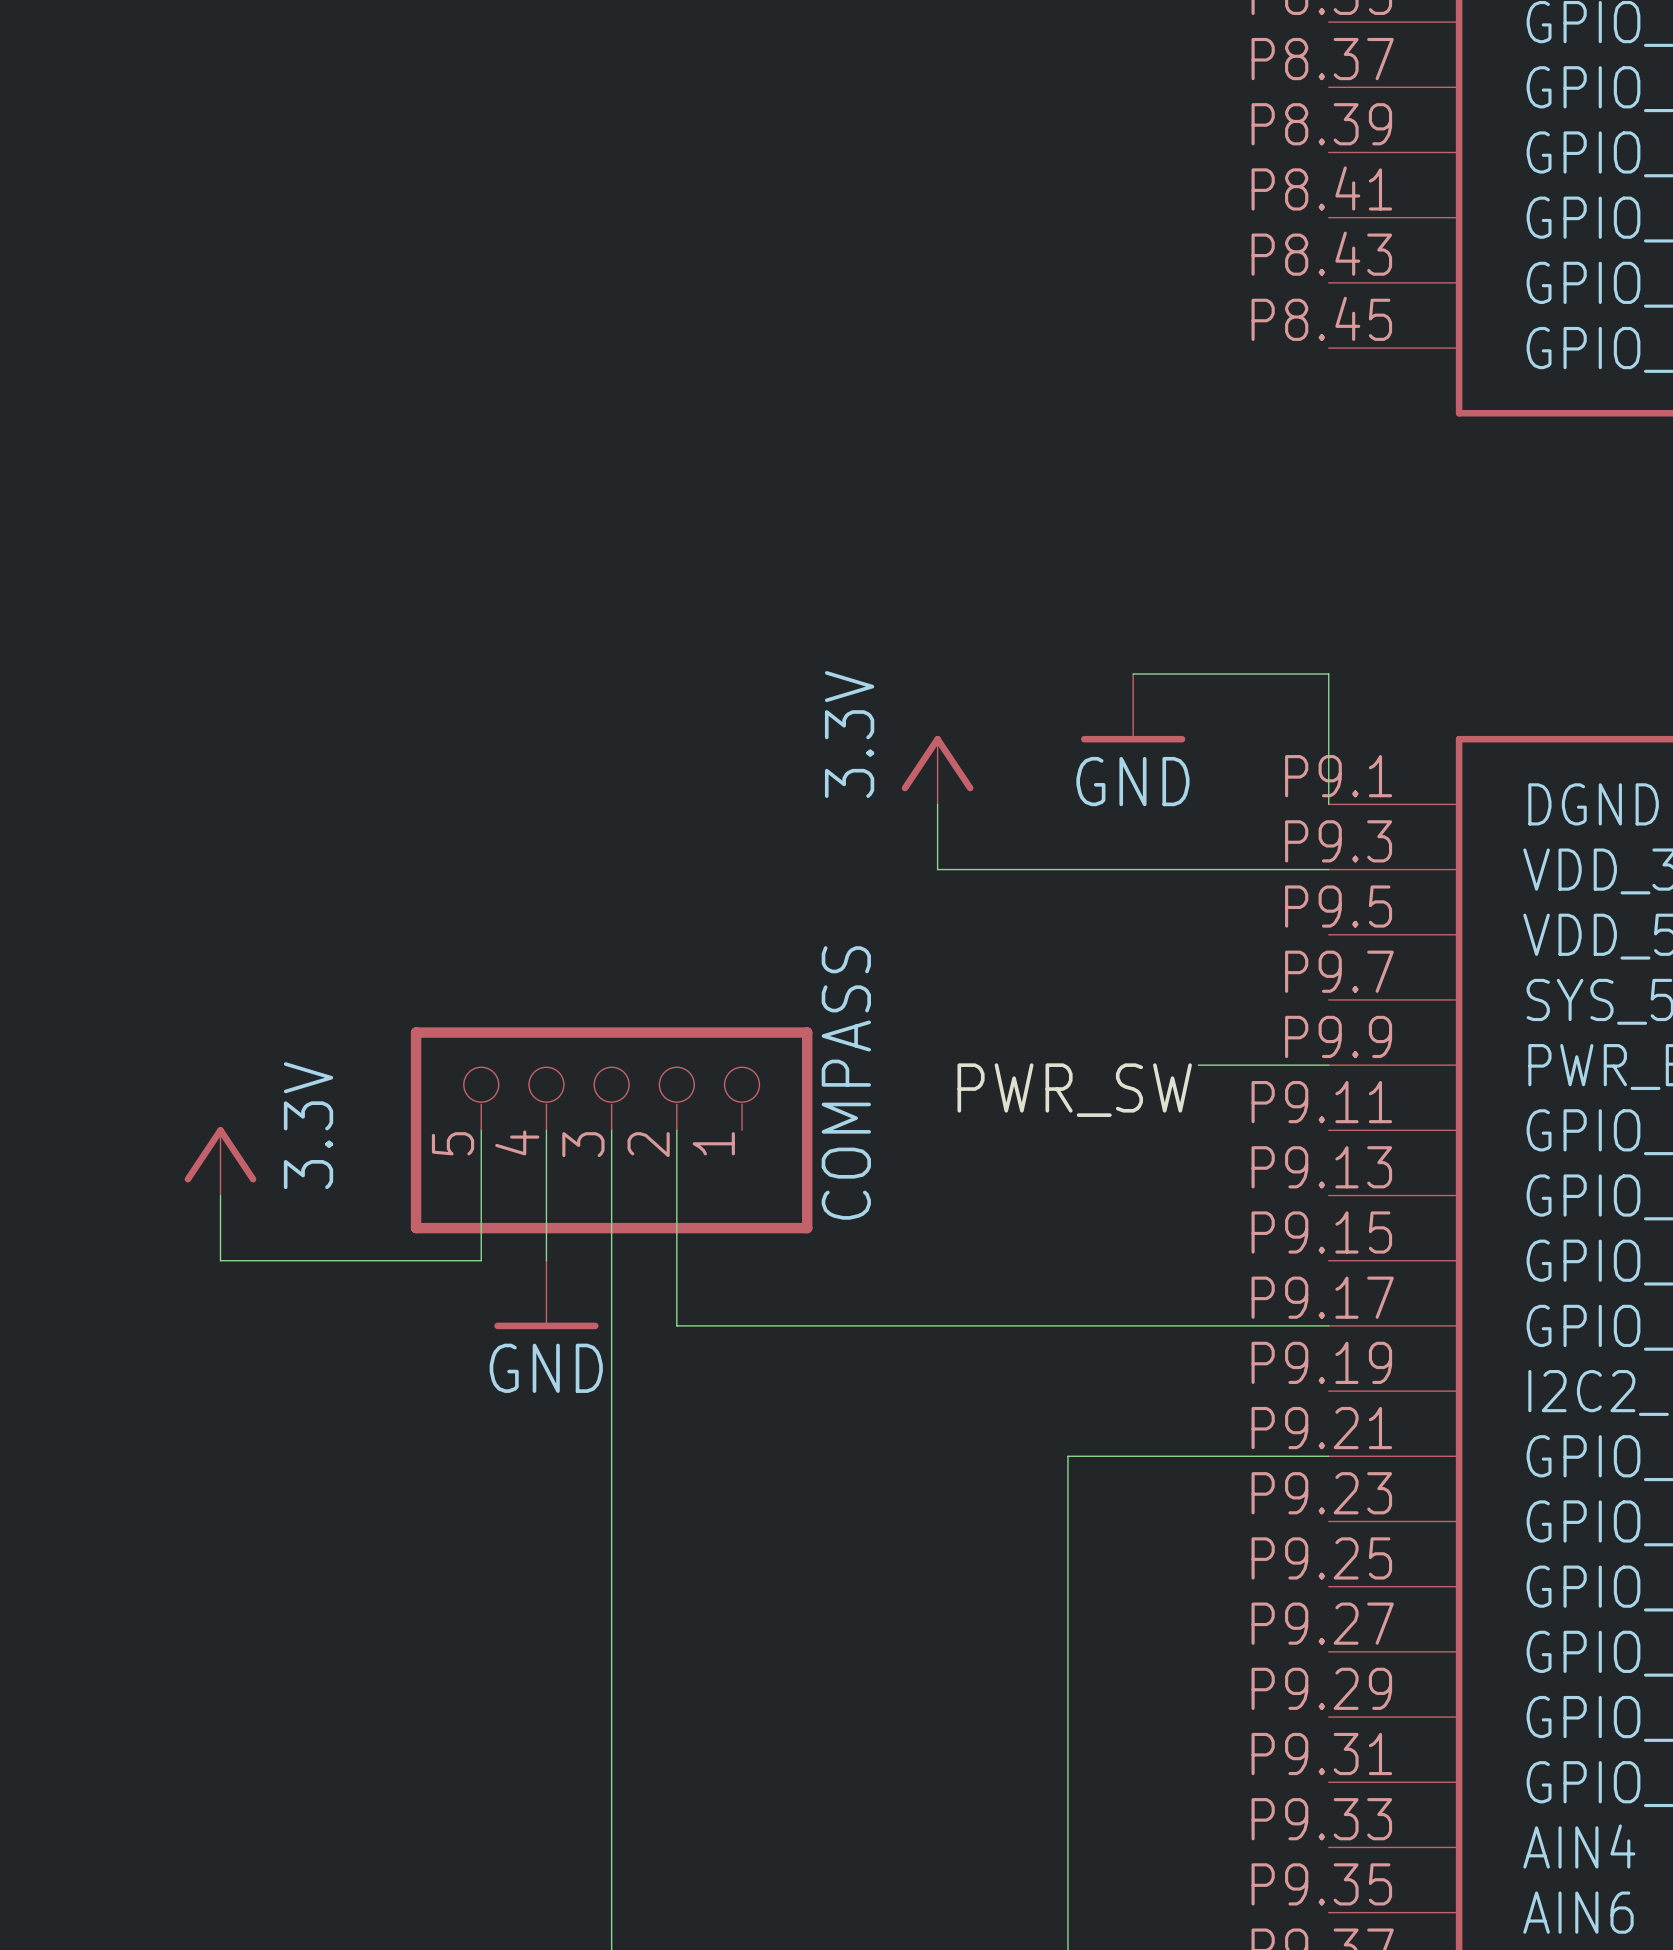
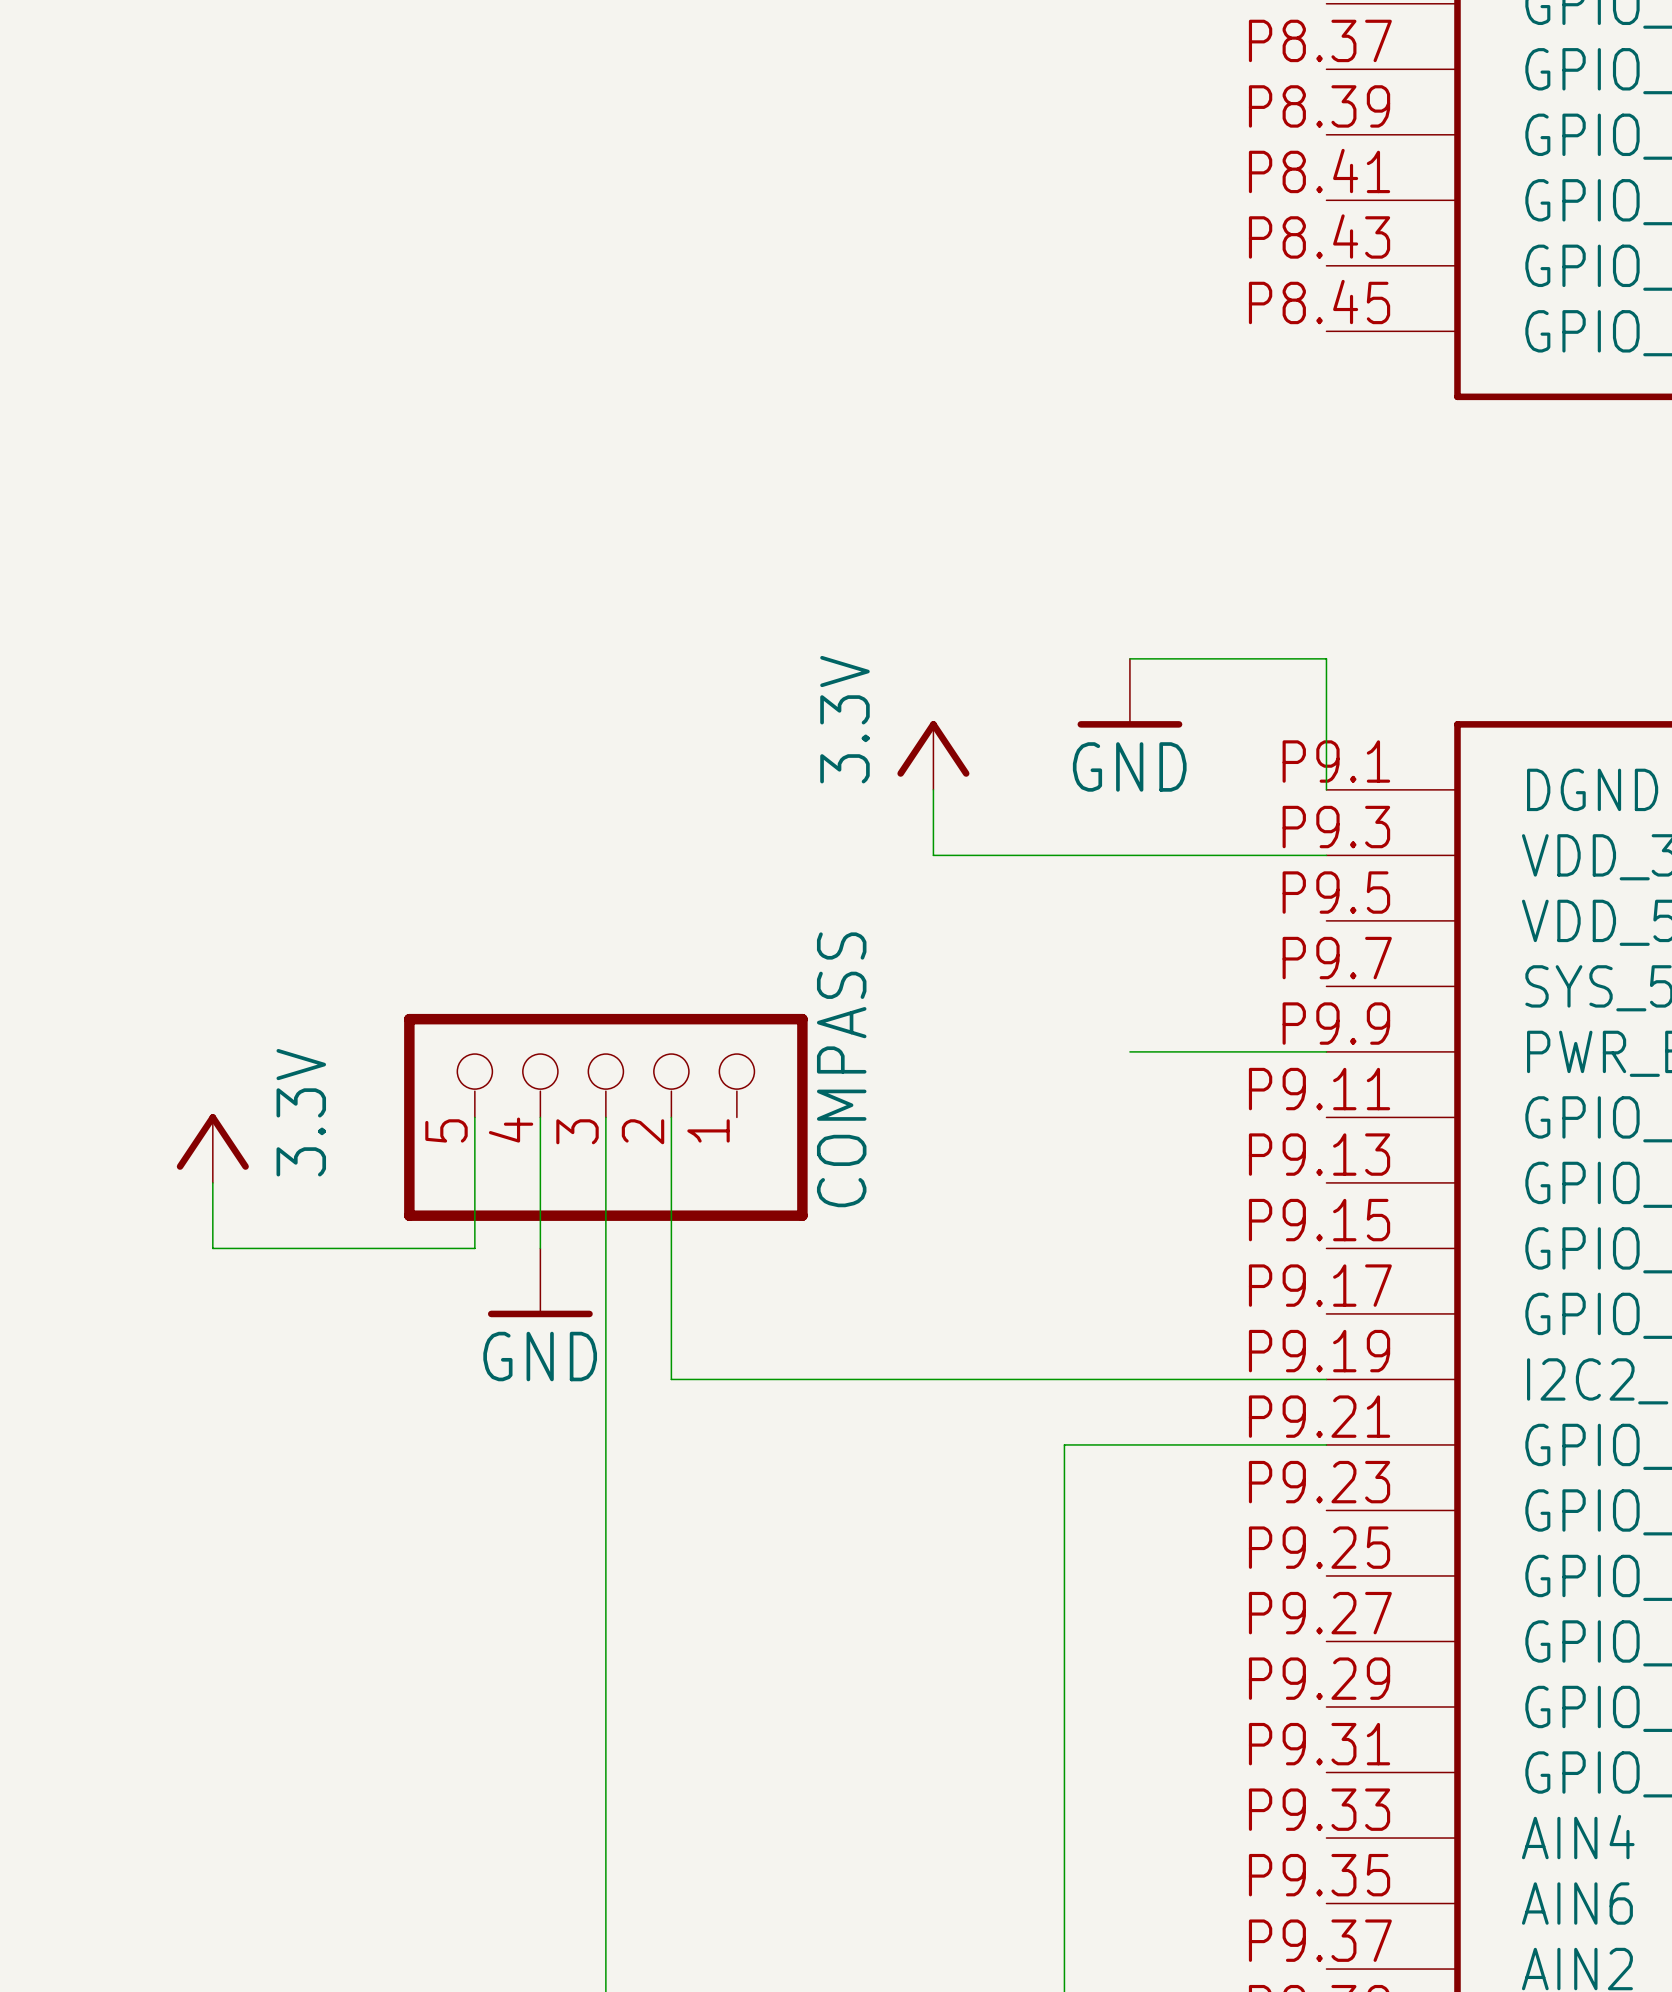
wire: none -> (1129, 1051) (1195, 1051)
label: PWR_SW (1074, 1090) -> none
wire: (676, 1325) (1328, 1325) -> (671, 1313) (671, 1379) (1326, 1379)

